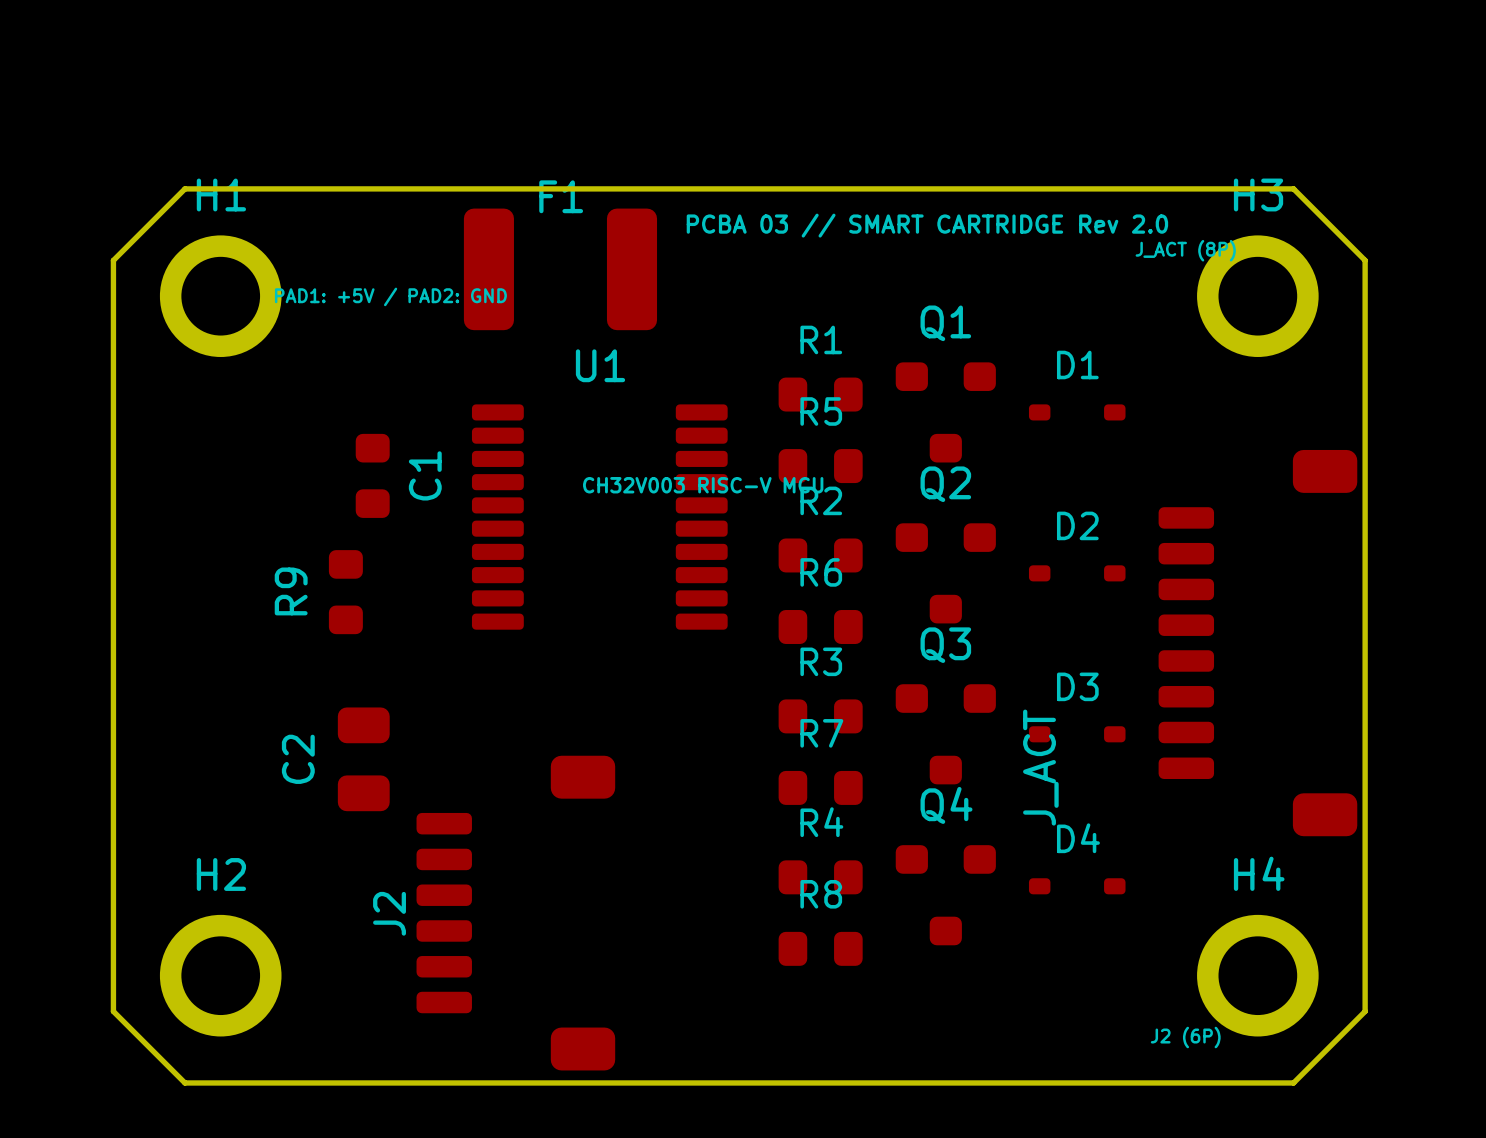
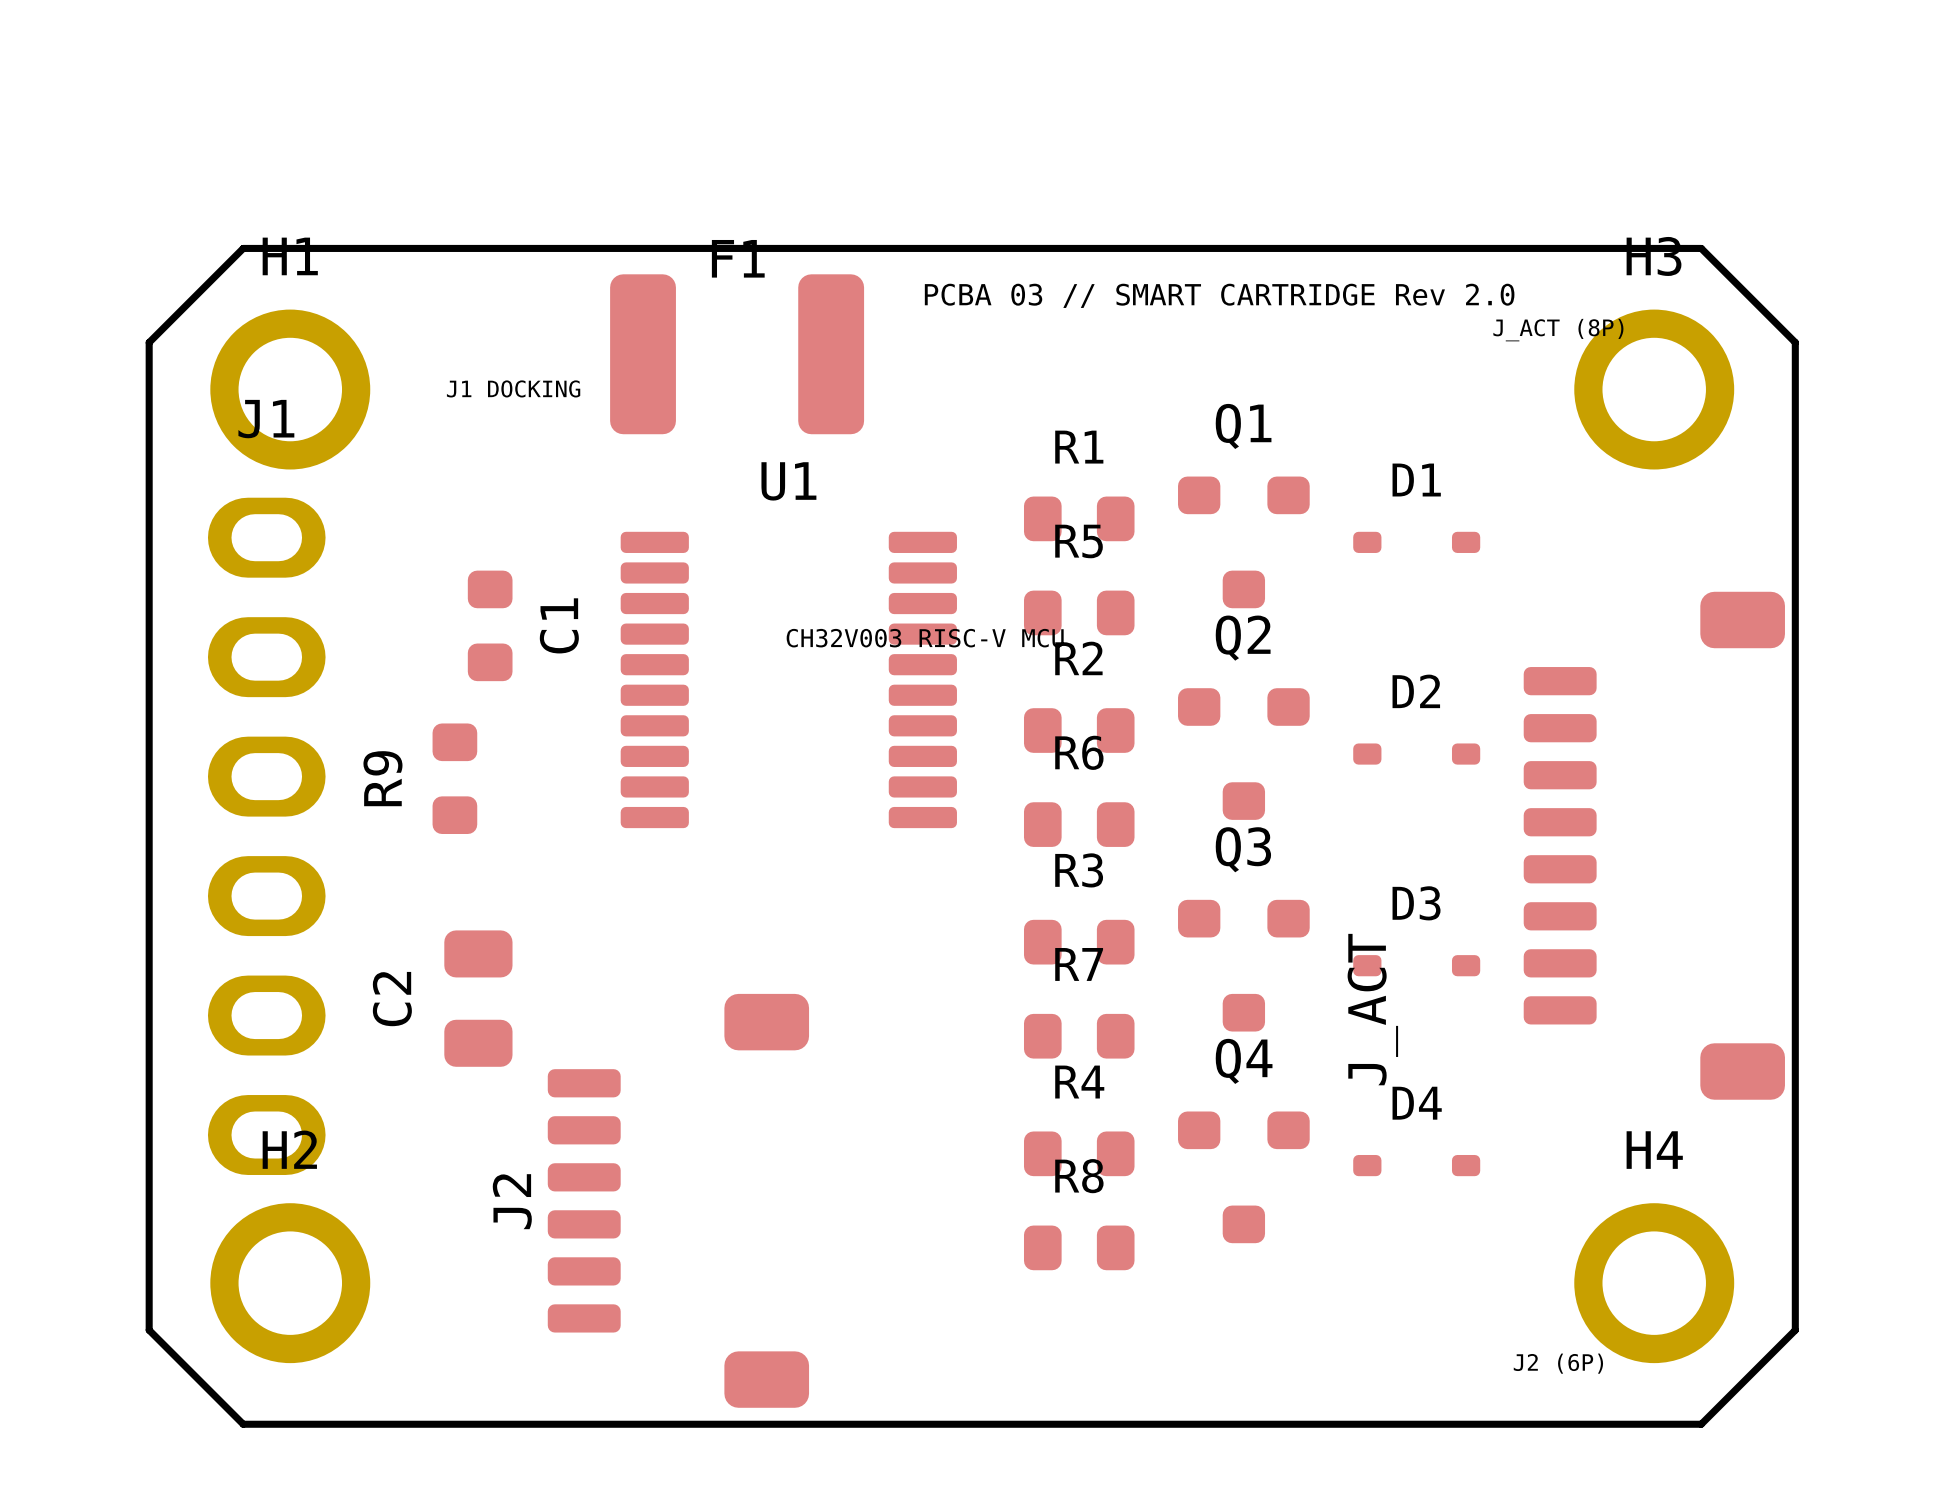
text: PAD1: +5V / PAD2: GND (390, 296) -> J1 DOCKING (513, 388)
J1: none -> (266, 836)

